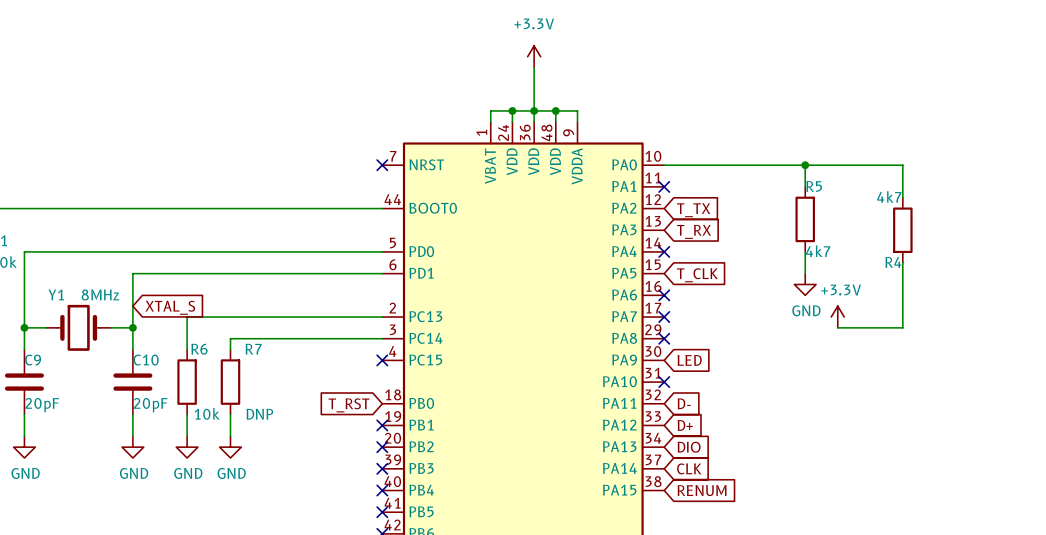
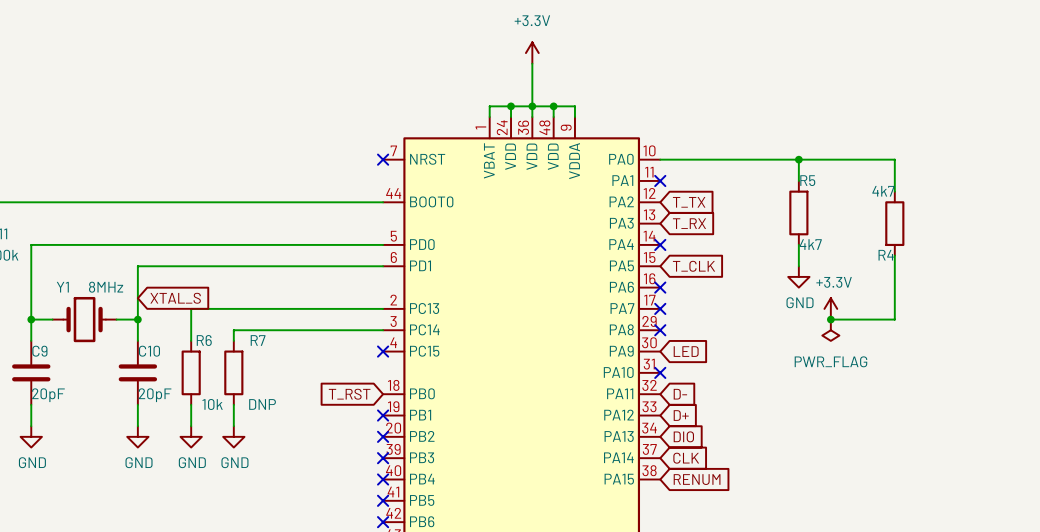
junction: none -> (830, 319)
power symbol: none -> PWR_FLAG (830, 330)

